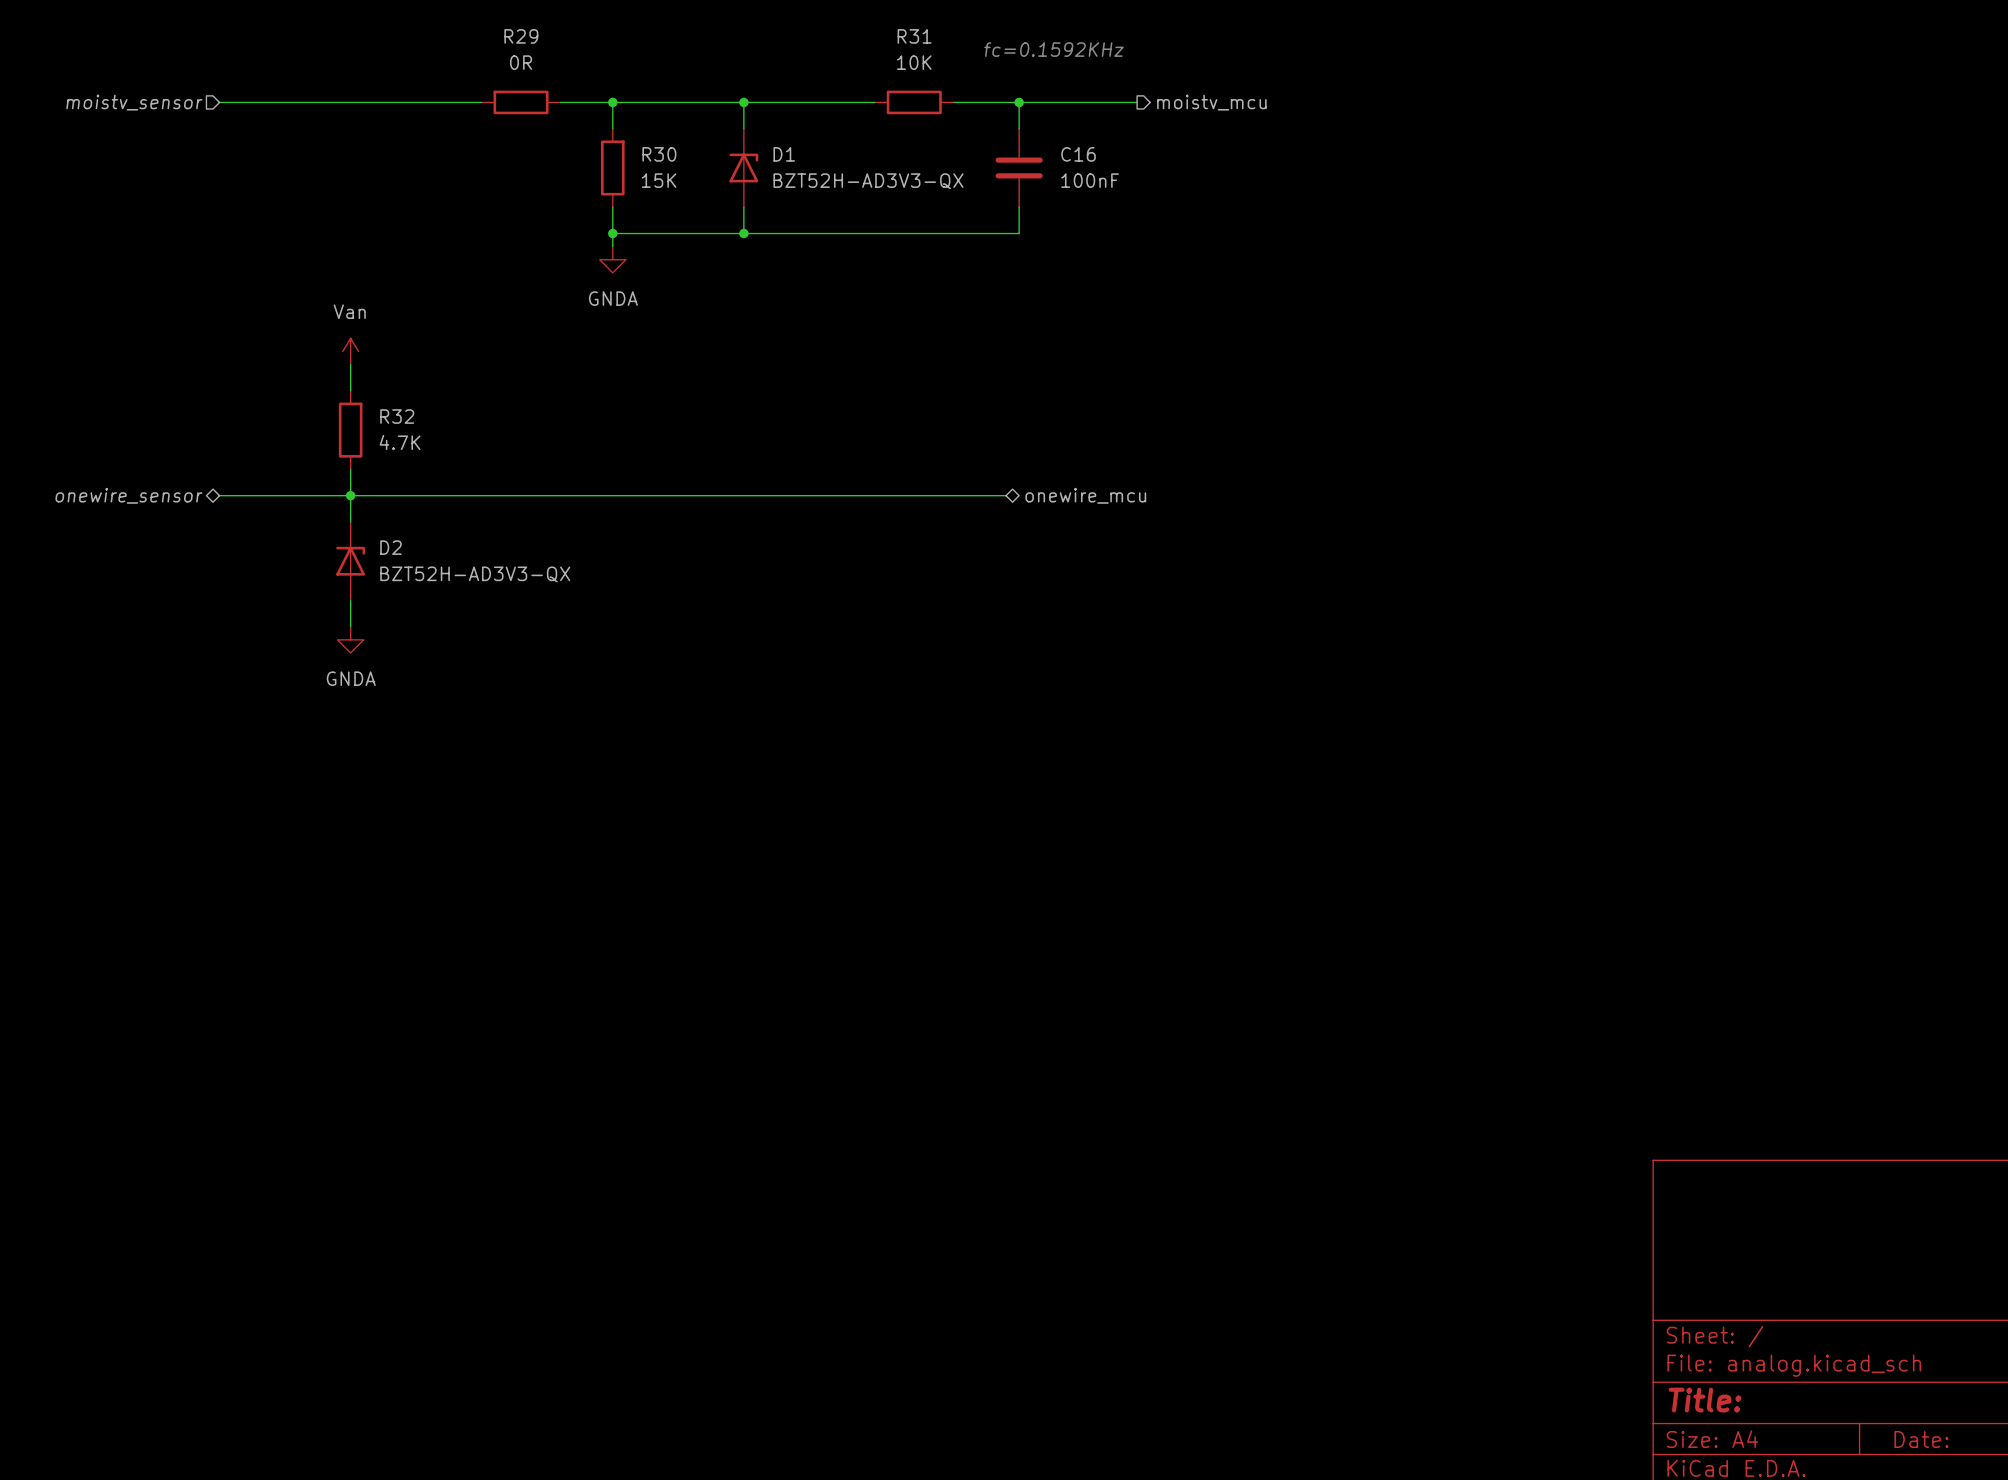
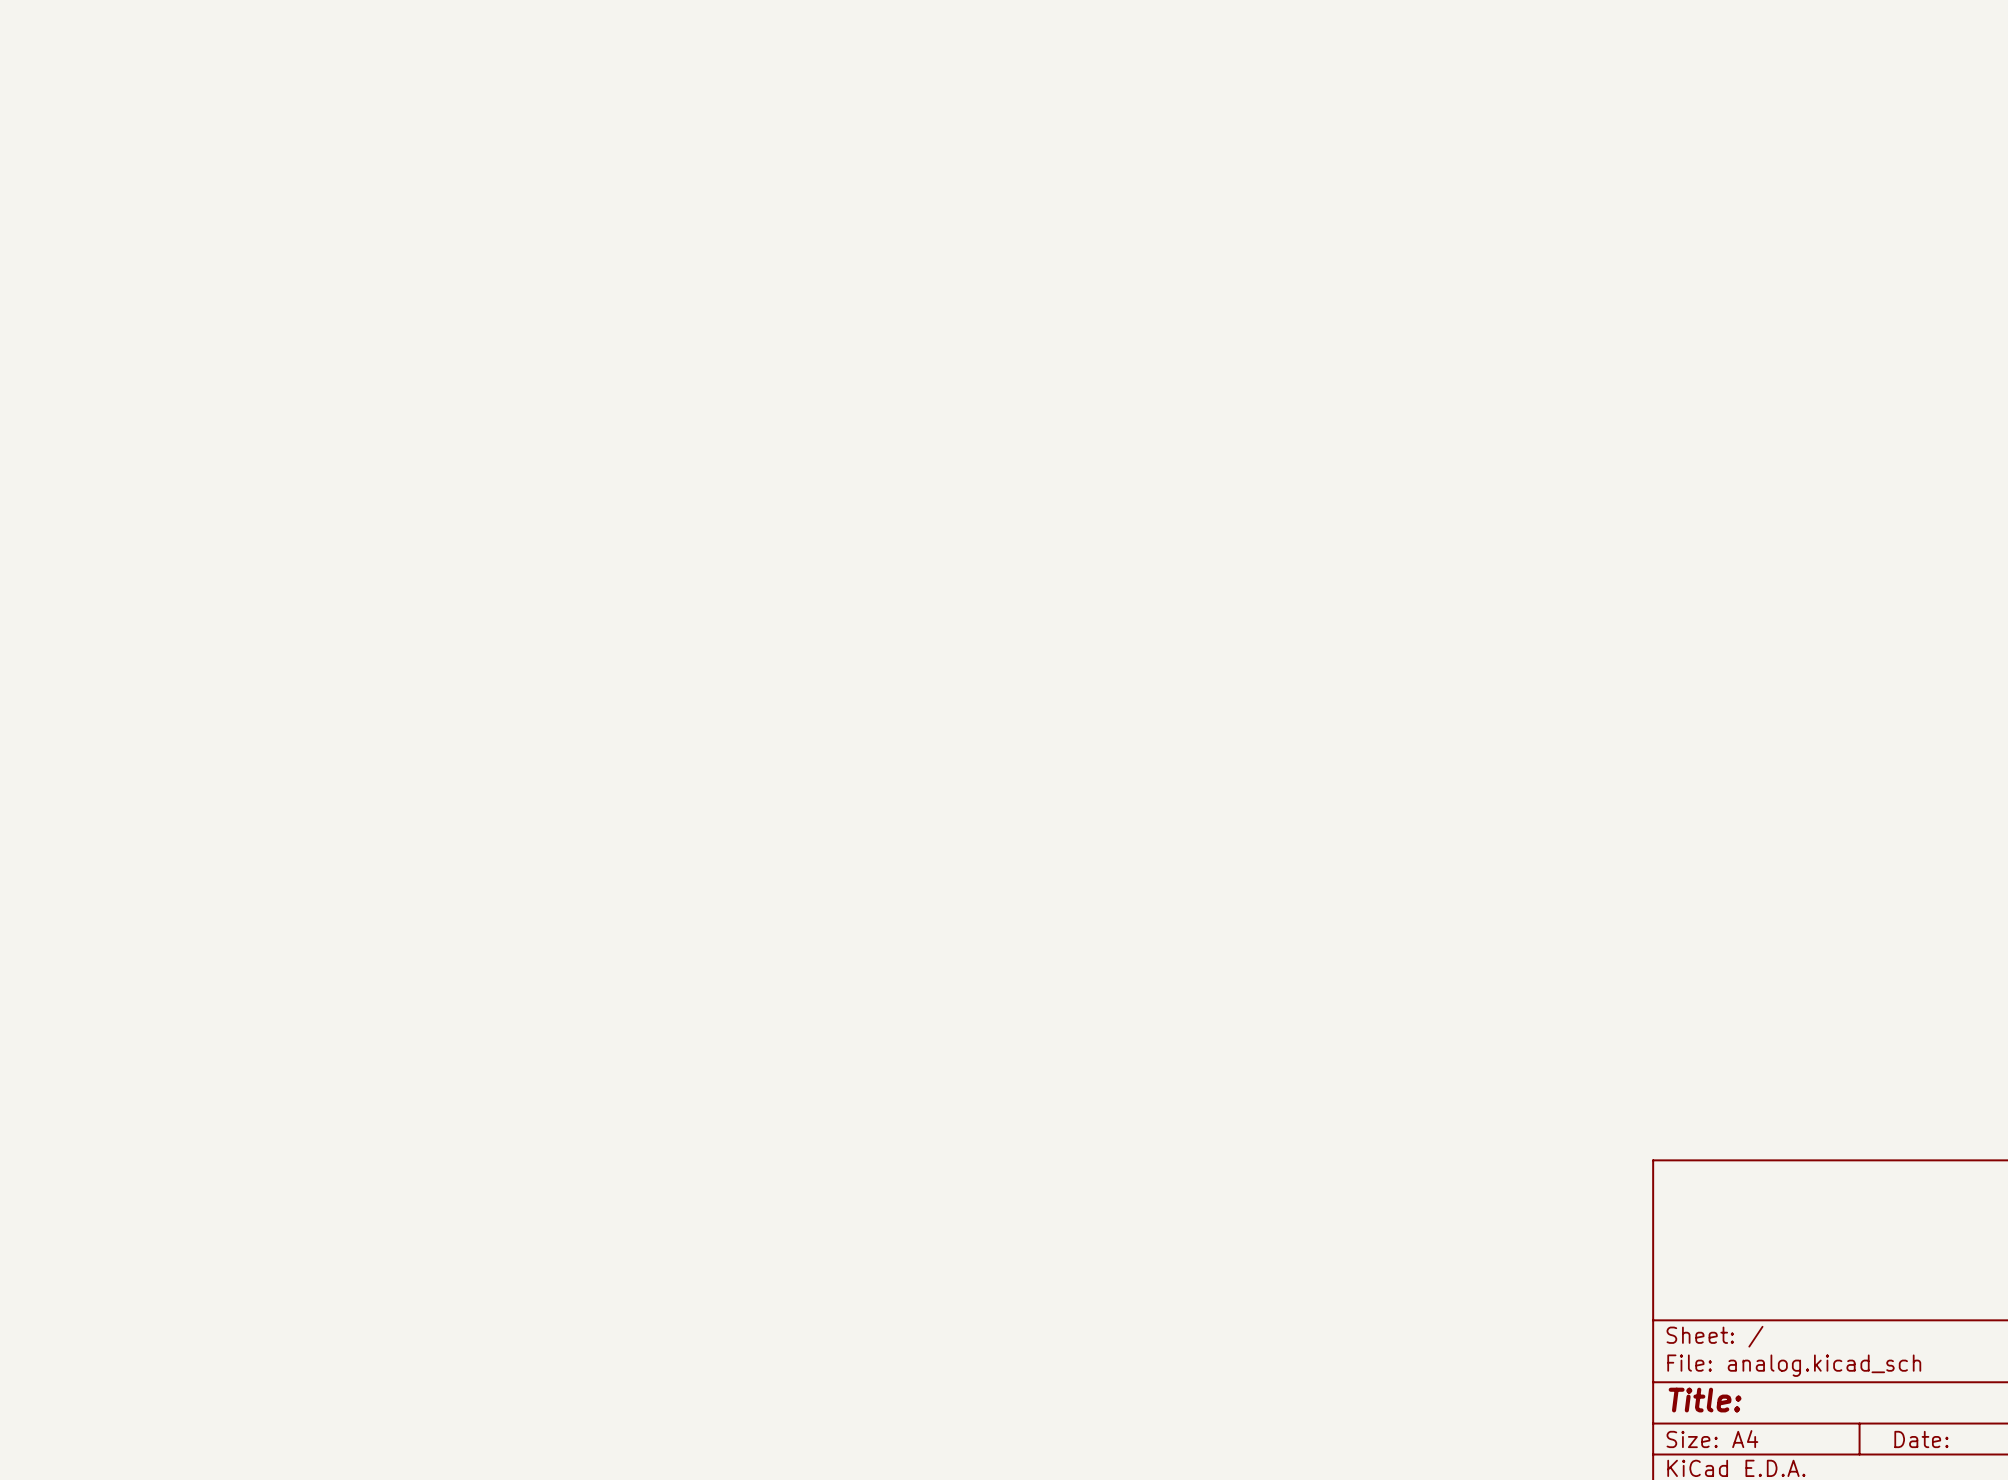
text: fc=0.1592KHz (1053, 49) -> none
hierarchical label: moistv_sensor (134, 102) -> none
wire: (219, 102) (481, 102) -> none
R29: 0R (521, 102) -> none
wire: (560, 102) (874, 102) -> none
wire: (612, 102) (612, 128) -> none
junction: (612, 102) -> none
wire: (743, 102) (743, 128) -> none
junction: (743, 102) -> none
R31: 10K (914, 102) -> none
wire: (953, 102) (1137, 102) -> none
wire: (1019, 102) (1019, 128) -> none
junction: (1019, 102) -> none
hierarchical label: moistv_mcu (1211, 102) -> none
R30: 15K (612, 167) -> none
D1: BZT52H-AD3V3-QX (743, 167) -> none
C16: 100nF (1019, 167) -> none
wire: (612, 207) (612, 246) -> none
wire: (743, 207) (743, 233) -> none
wire: (1019, 207) (1019, 233) (612, 233) -> none
junction: (612, 233) -> none
junction: (743, 233) -> none
power symbol: GNDA (612, 259) -> none
power symbol: Van (350, 351) -> none
wire: (350, 364) (350, 390) -> none
R32: 4.7K (350, 430) -> none
wire: (350, 469) (350, 521) -> none
hierarchical label: onewire_sensor (128, 495) -> none
wire: (219, 495) (1006, 495) -> none
junction: (350, 495) -> none
hierarchical label: onewire_mcu (1085, 495) -> none
D2: BZT52H-AD3V3-QX (350, 561) -> none
wire: (350, 600) (350, 626) -> none
power symbol: GNDA (350, 639) -> none

